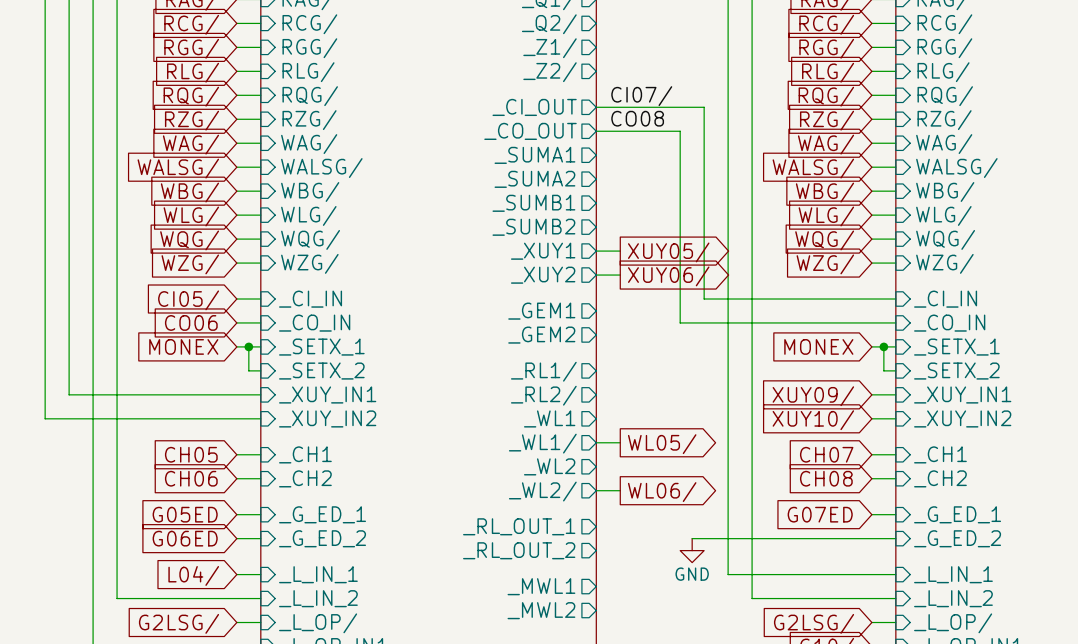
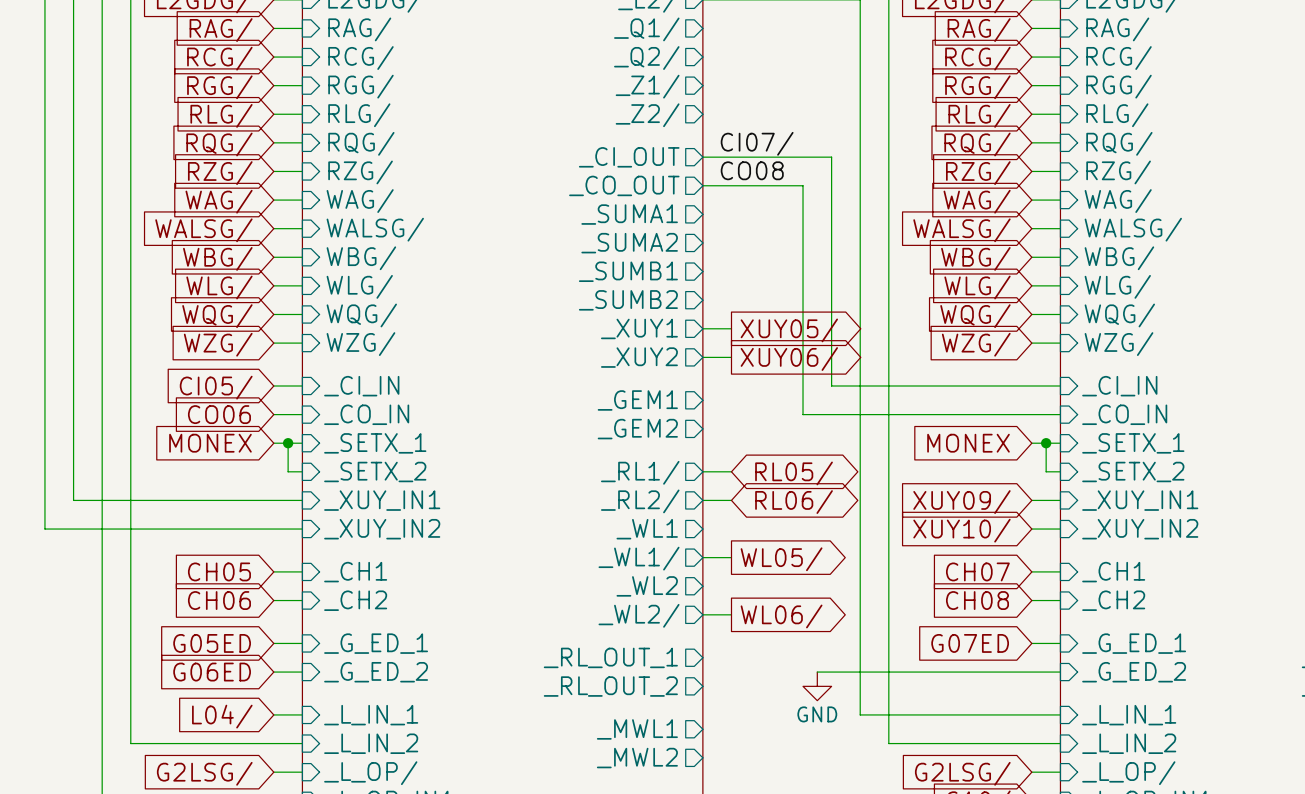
wire: none -> (702, 471) (731, 471)
global label: none -> RL05/ (794, 473)
wire: none -> (702, 500) (731, 500)
global label: none -> RL06/ (794, 502)

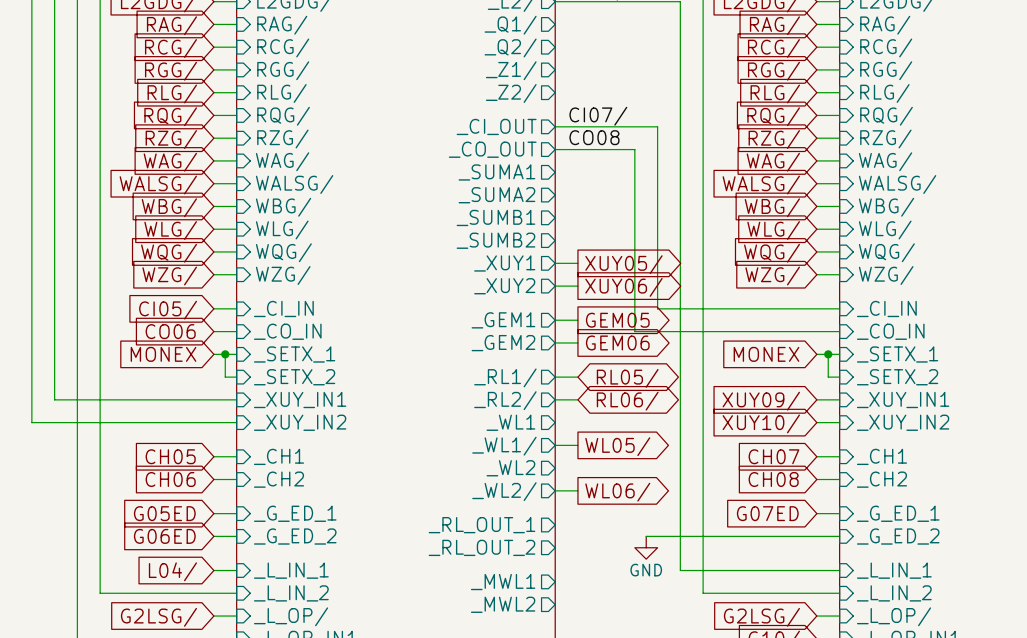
wire: none -> (555, 320) (577, 320)
global label: none -> GEM05 (617, 320)
wire: none -> (555, 342) (577, 342)
global label: none -> GEM06 (617, 342)

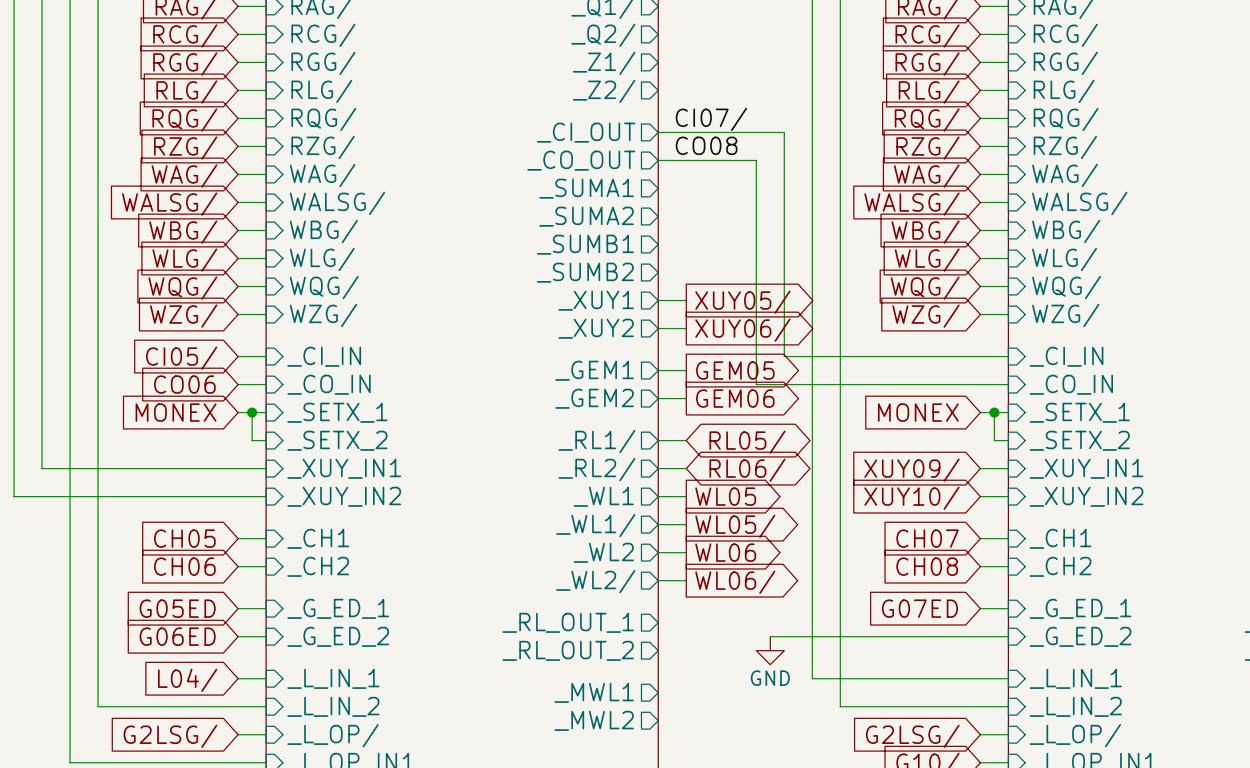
wire: none -> (658, 496) (686, 496)
global label: none -> WL05 (725, 496)
wire: none -> (658, 552) (686, 552)
global label: none -> WL06 (725, 552)

